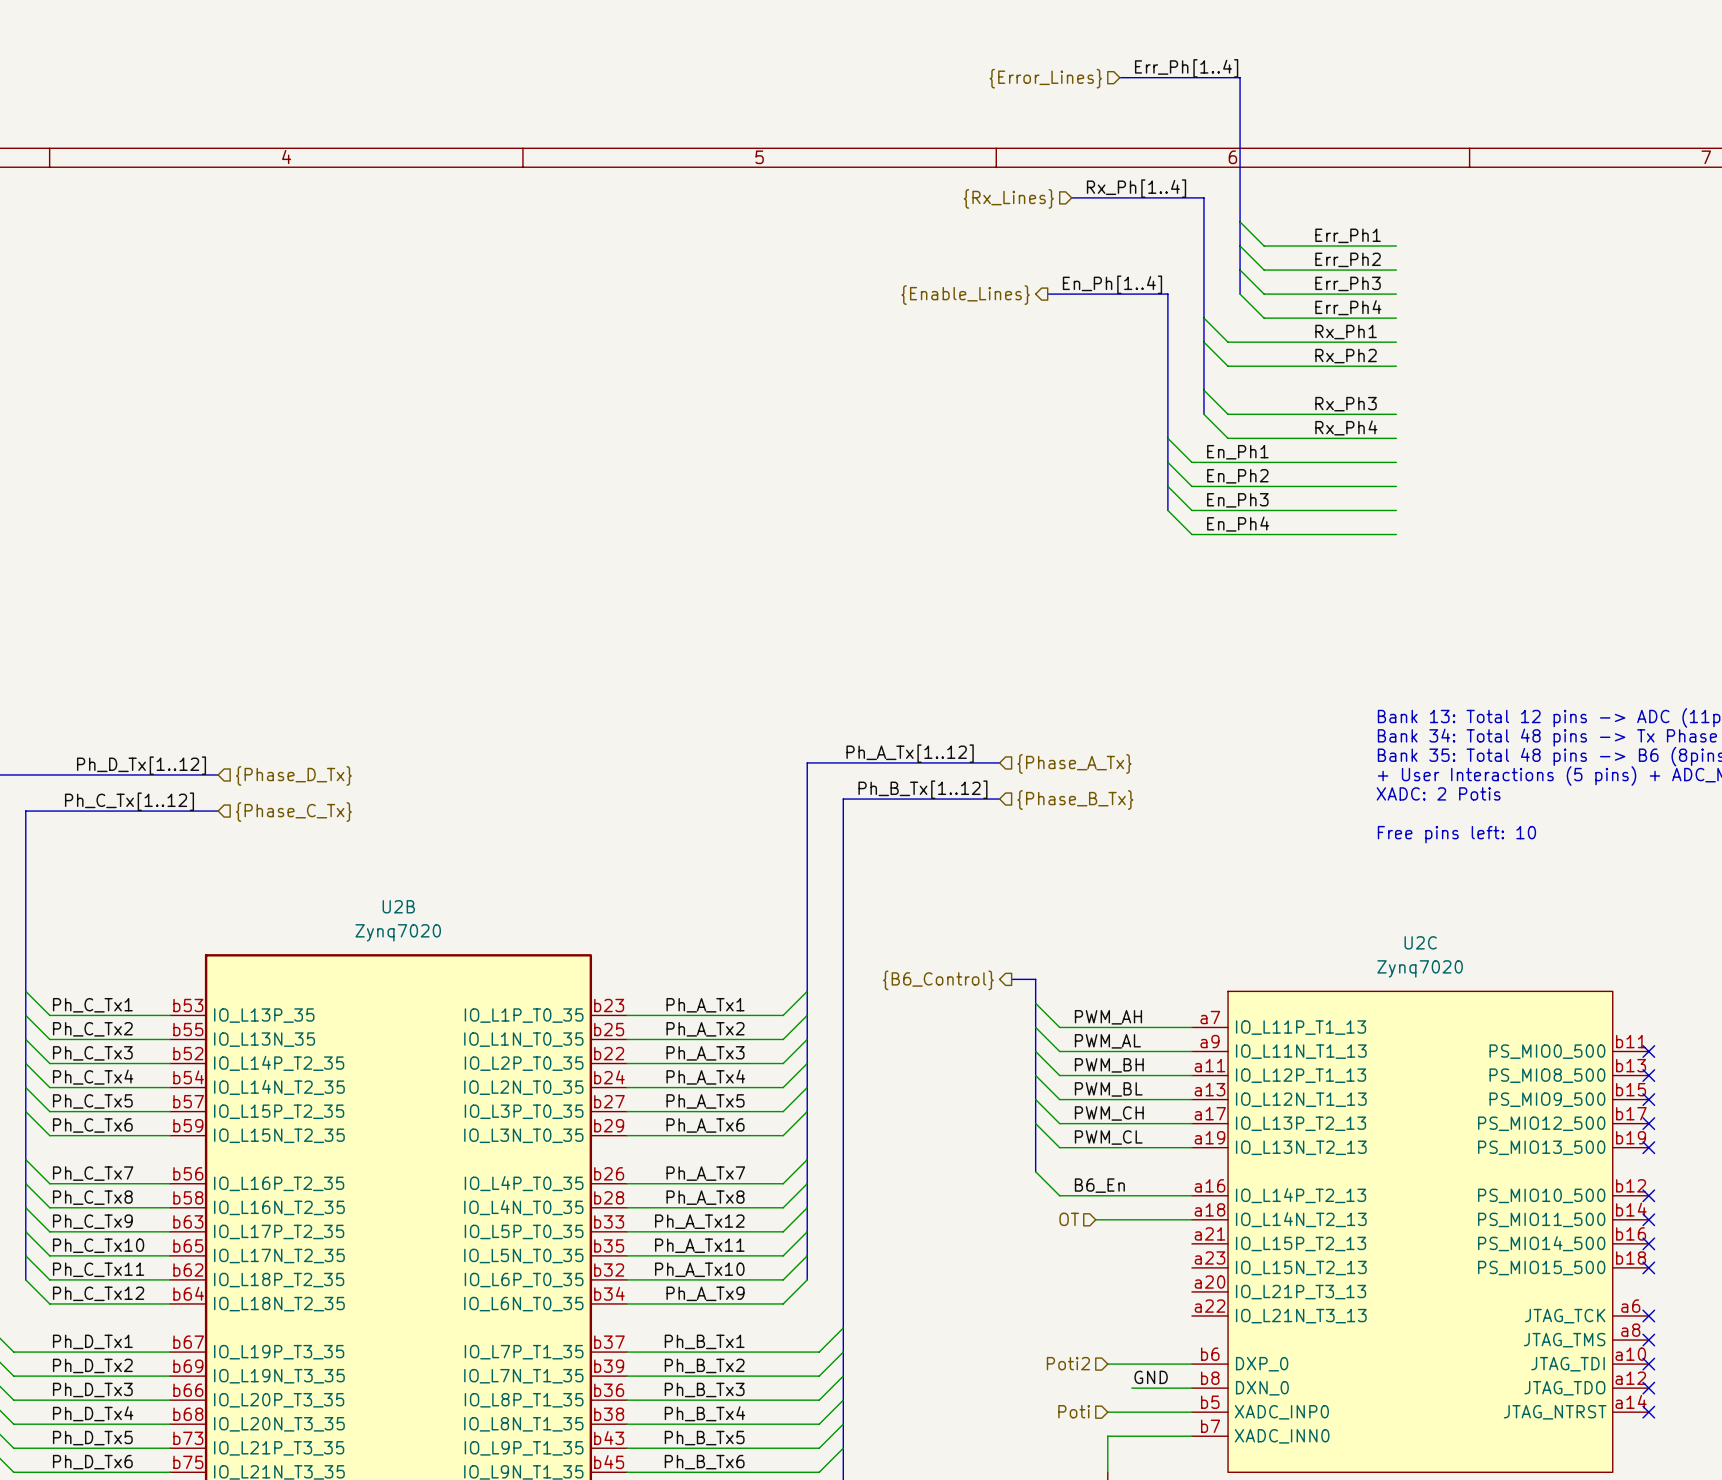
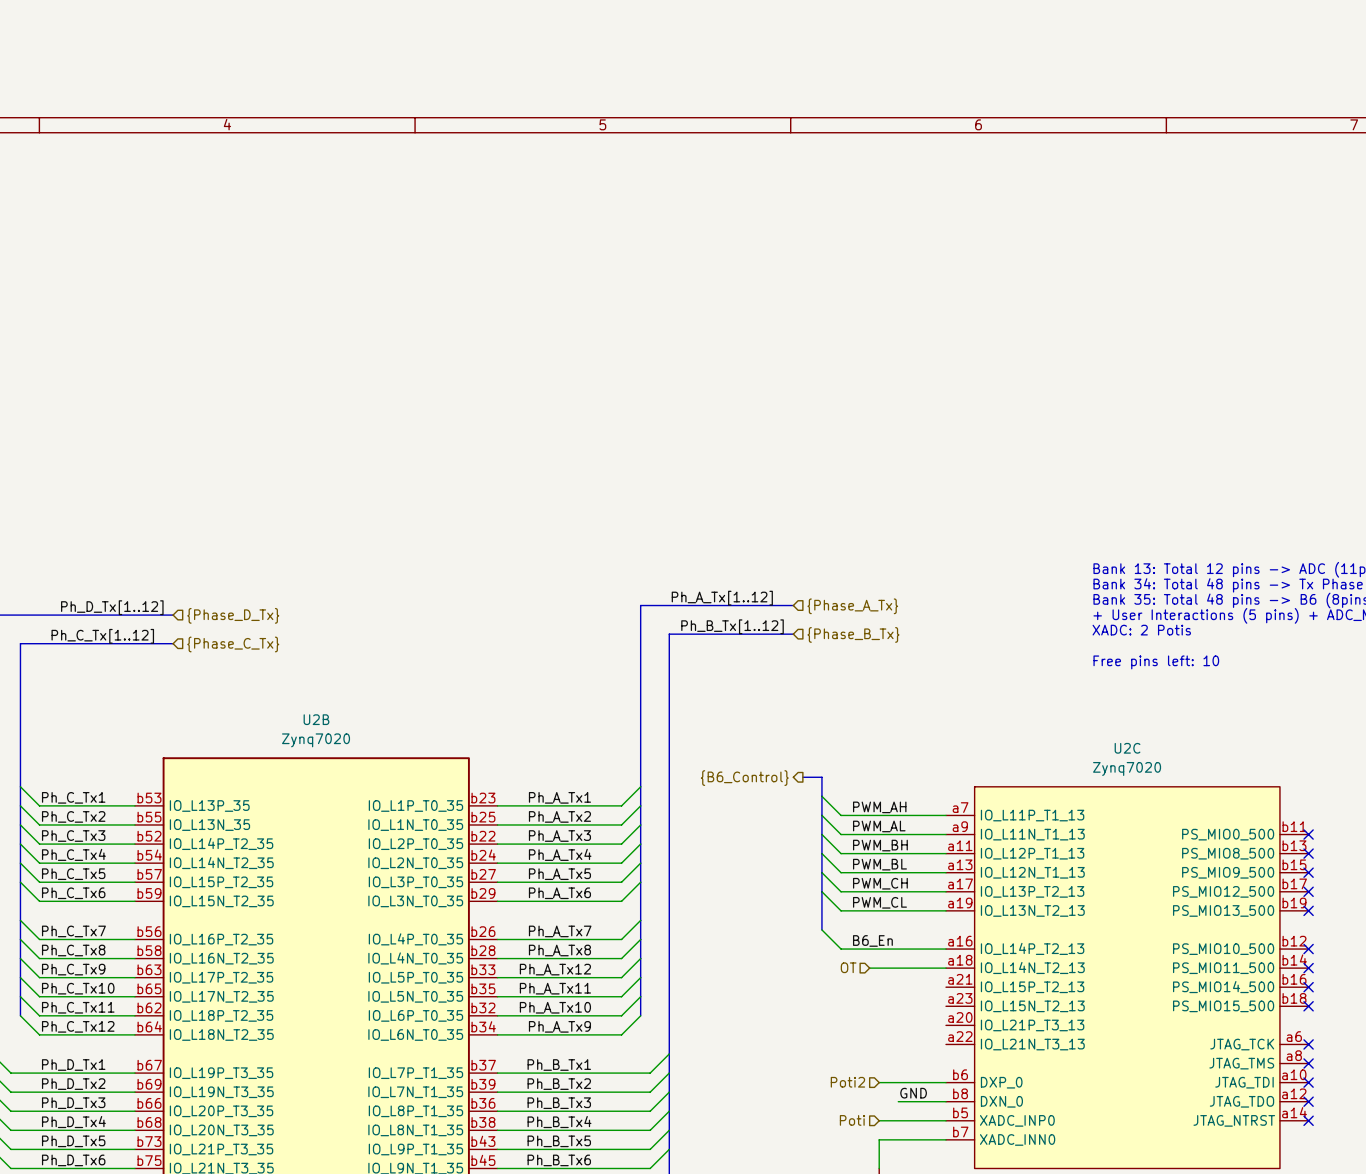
label: Err_Ph[1..4] (1186, 68) -> none
bus: (1119, 77) (1240, 77) (1240, 294) -> none
hierarchical label: {Error_Lines} (1045, 78) -> none
label: Rx_Ph[1..4] (1136, 188) -> none
bus: (1071, 197) (1203, 197) (1203, 414) -> none
hierarchical label: {Rx_Lines} (1008, 198) -> none
wire: (1240, 221) (1264, 245) (1396, 245) -> none
label: Err_Ph1 (1348, 235) -> none
wire: (1240, 245) (1264, 270) (1396, 270) -> none
label: Err_Ph2 (1348, 259) -> none
wire: (1240, 270) (1264, 294) (1396, 294) -> none
label: Err_Ph3 (1348, 283) -> none
label: En_Ph[1..4] (1112, 284) -> none
bus: (1047, 294) (1167, 294) (1167, 510) -> none
wire: (1240, 294) (1264, 318) (1396, 318) -> none
hierarchical label: {Enable_Lines} (965, 295) -> none
label: Err_Ph4 (1348, 307) -> none
wire: (1203, 318) (1228, 342) (1396, 342) -> none
label: Rx_Ph1 (1346, 332) -> none
wire: (1203, 342) (1228, 366) (1396, 366) -> none
label: Rx_Ph2 (1346, 356) -> none
wire: (1203, 390) (1228, 414) (1396, 414) -> none
label: Rx_Ph3 (1346, 404) -> none
wire: (1203, 414) (1228, 438) (1396, 438) -> none
label: Rx_Ph4 (1346, 427) -> none
wire: (1167, 438) (1191, 462) (1396, 462) -> none
label: En_Ph1 (1237, 452) -> none
wire: (1167, 462) (1191, 486) (1396, 486) -> none
label: En_Ph2 (1237, 476) -> none
wire: (1167, 486) (1191, 510) (1396, 510) -> none
label: En_Ph3 (1237, 500) -> none
wire: (1167, 510) (1191, 534) (1396, 534) -> none
label: En_Ph4 (1238, 524) -> none

